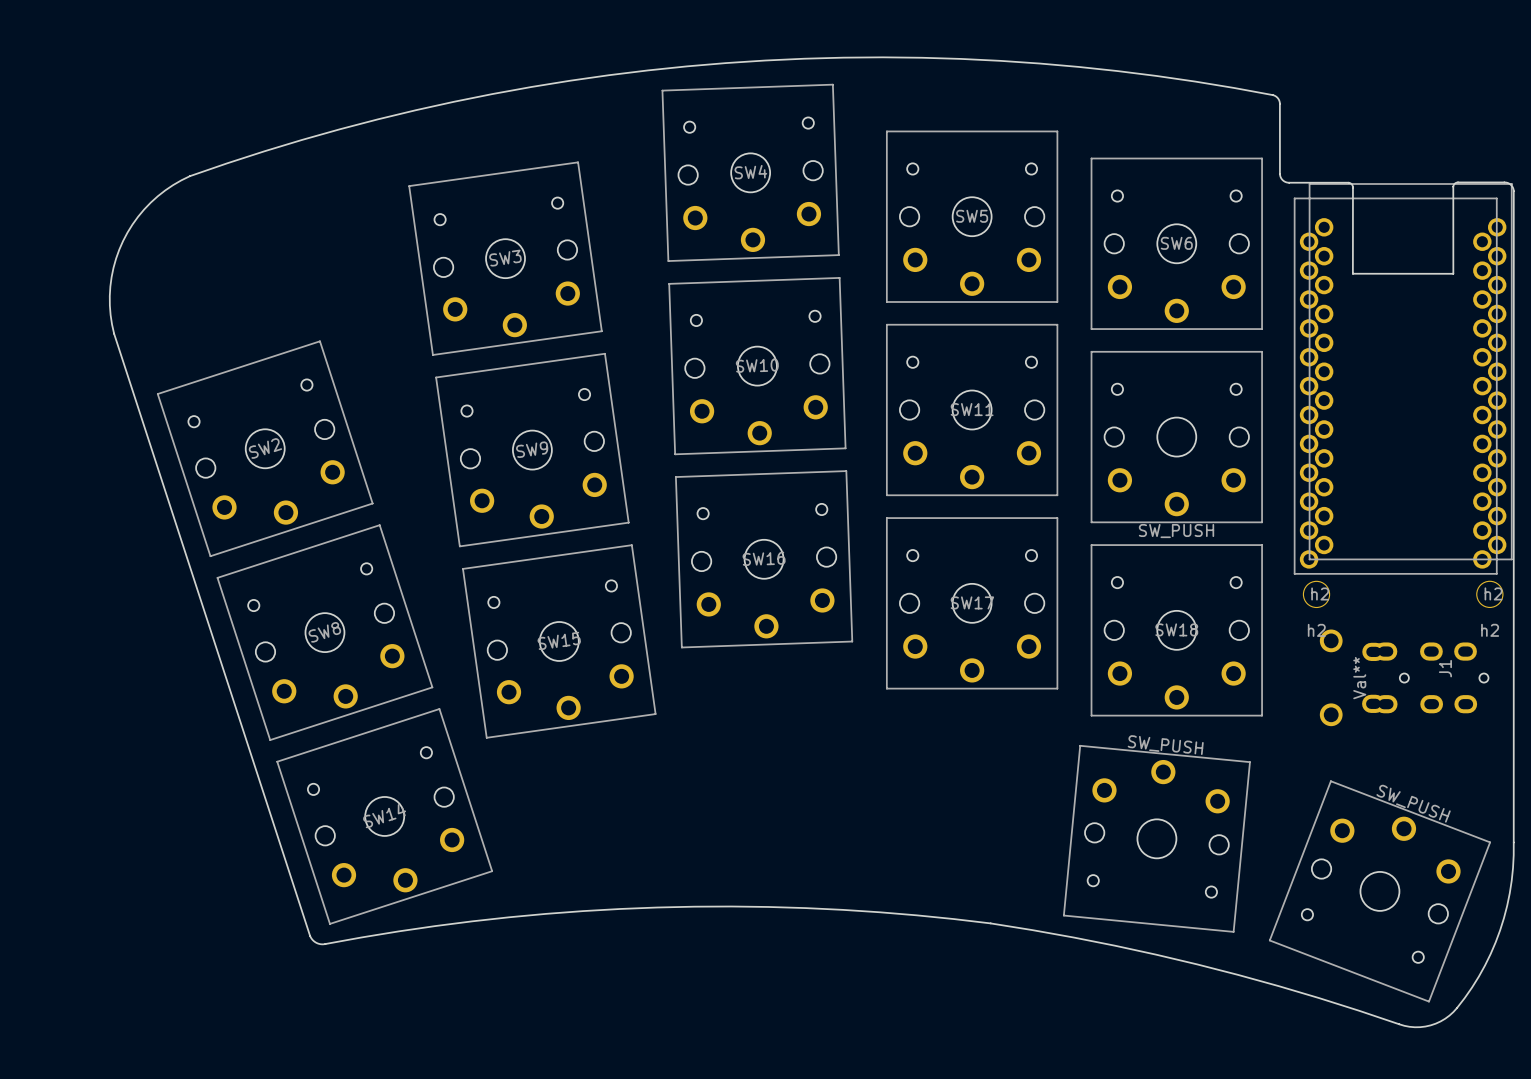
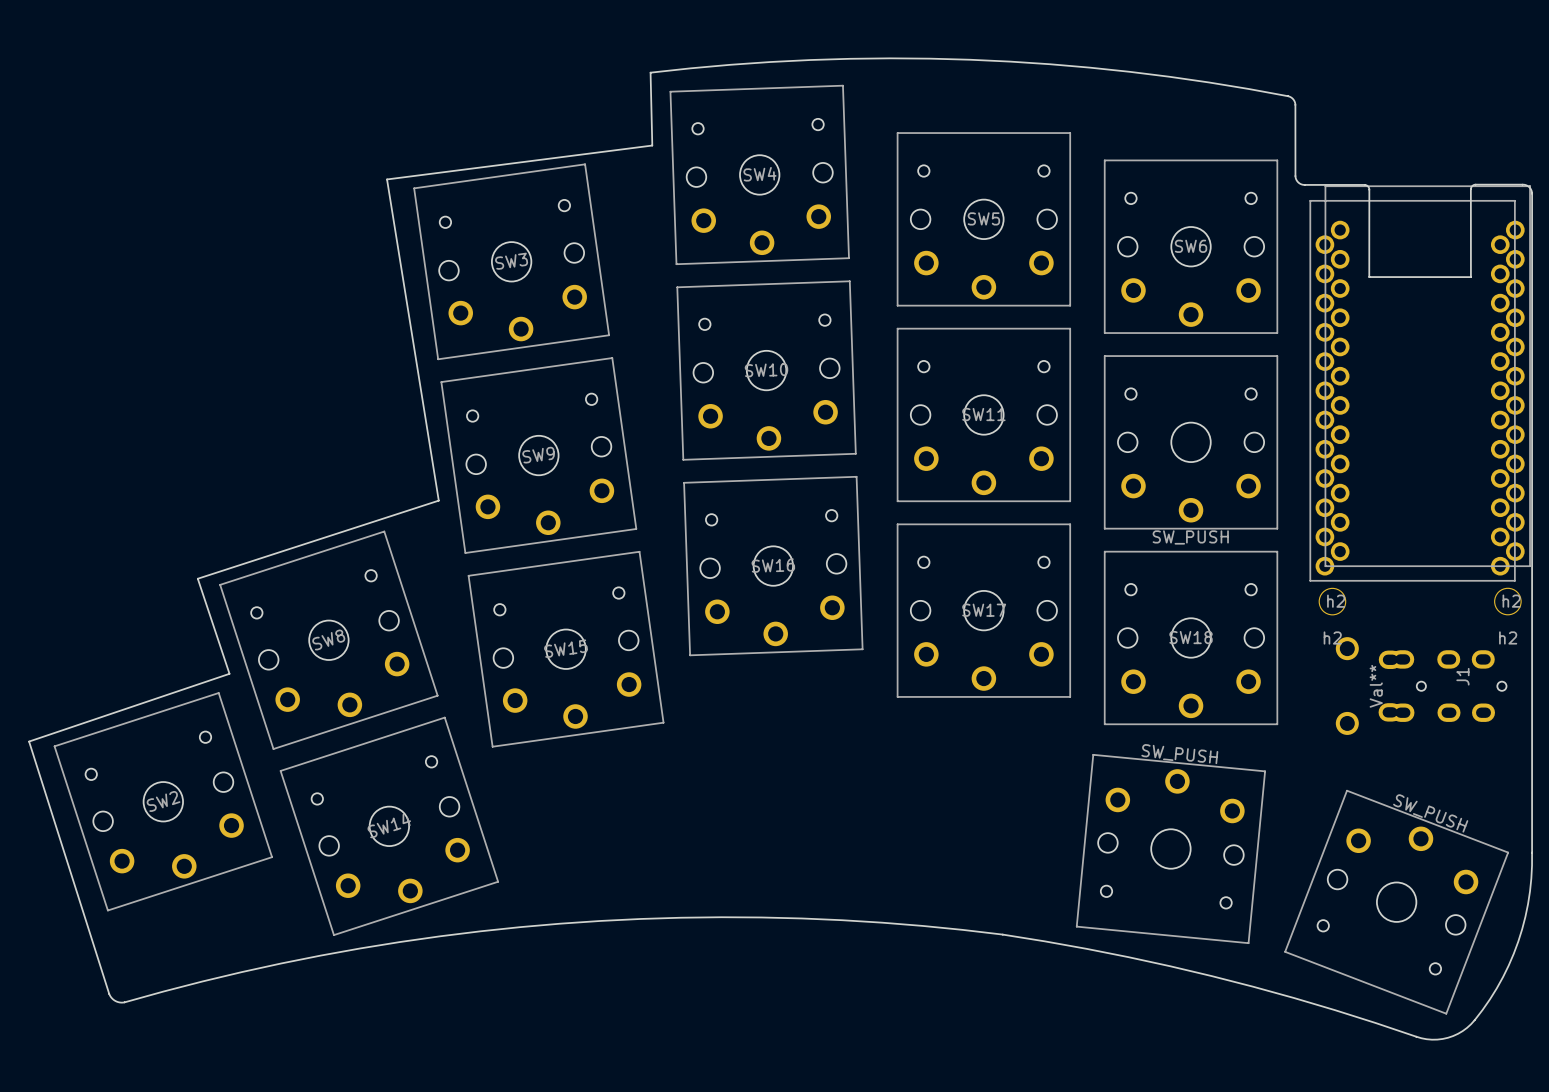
board edge: (1272, 95) (1195, 81) (1078, 66) (1000, 60) (882, 57) (765, 60) (686, 66) (608, 75) (492, 94) (377, 119) (301, 139) (189, 176) (173, 185) (144, 209) (123, 240) (111, 277) (110, 315) (114, 333) (310, 935) (316, 942) (323, 944) (472, 921) (620, 908) (768, 906) (879, 912) (990, 923) (1115, 945) (1197, 964) (1278, 986) (1399, 1024) -> (1288, 96) (1209, 82) (1129, 71) (1010, 61) (930, 58) (850, 58) (770, 62) (690, 68) (650, 72) (652, 145) (387, 179) (438, 500) (197, 578) (229, 673) (29, 741) (109, 994) (118, 1002) (124, 1002) (202, 981) (320, 955) (479, 931) (640, 918) (801, 918) (962, 929) (1086, 948) (1170, 966) (1253, 986) (1335, 1010) (1416, 1036)
SW2 position: (265, 448) -> (163, 801)

